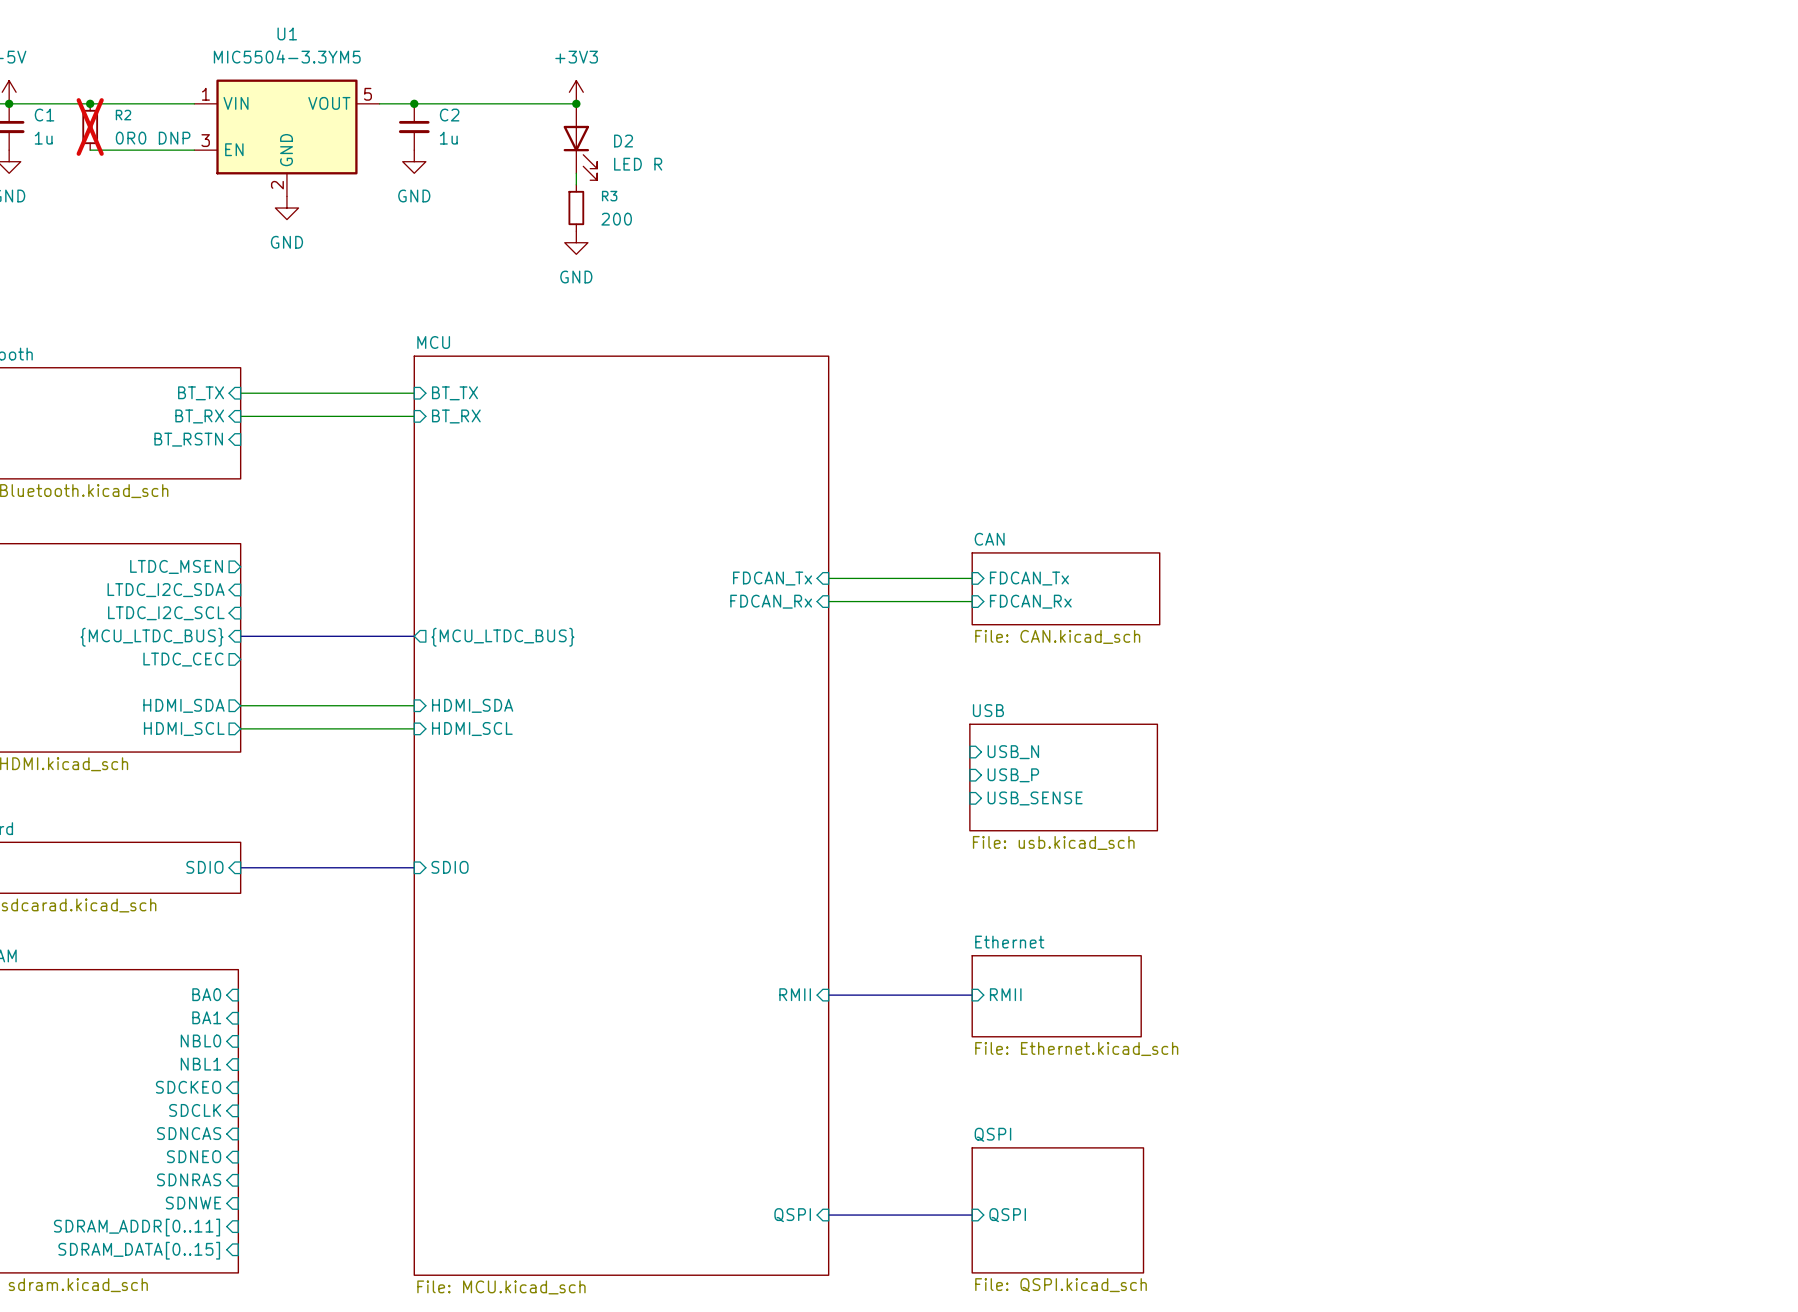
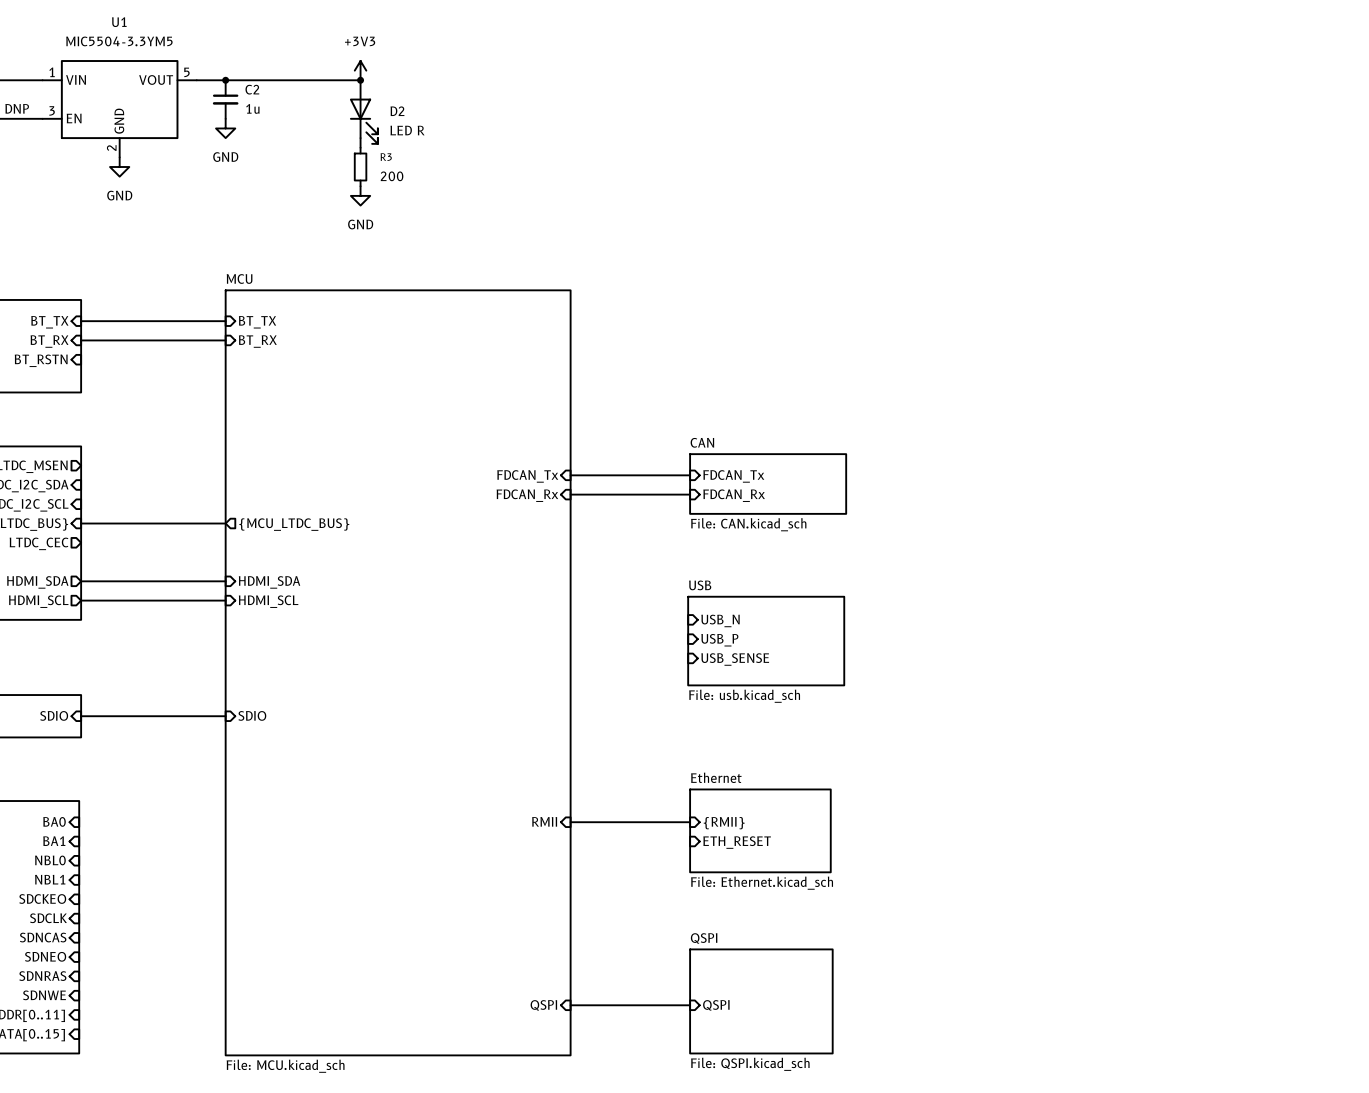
sheet pin: RMII (1005, 994) -> {RMII} (724, 823)
sheet Ethernet: File: Ethernet.kicad_sch (1056, 996) -> none
sheet Ethernet: none -> File: Ethernet.kicad_sch (760, 830)
sheet pin: none -> ETH_RESET (737, 842)

